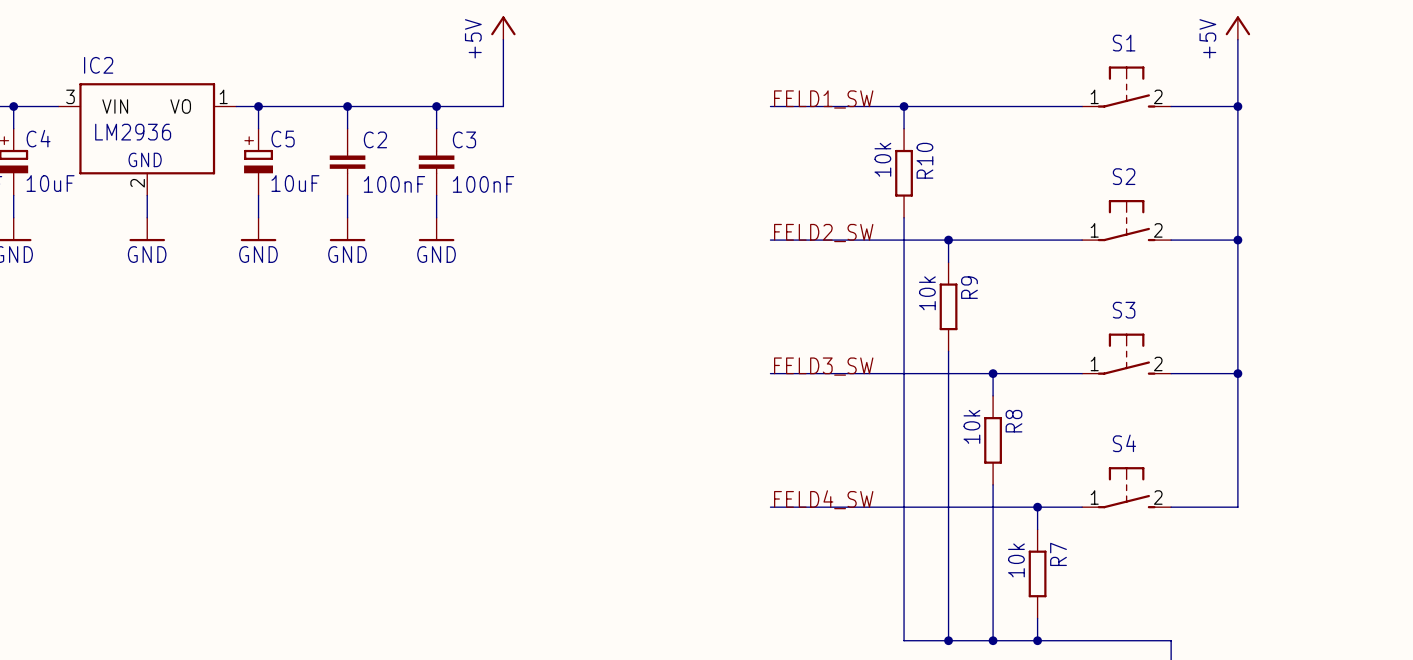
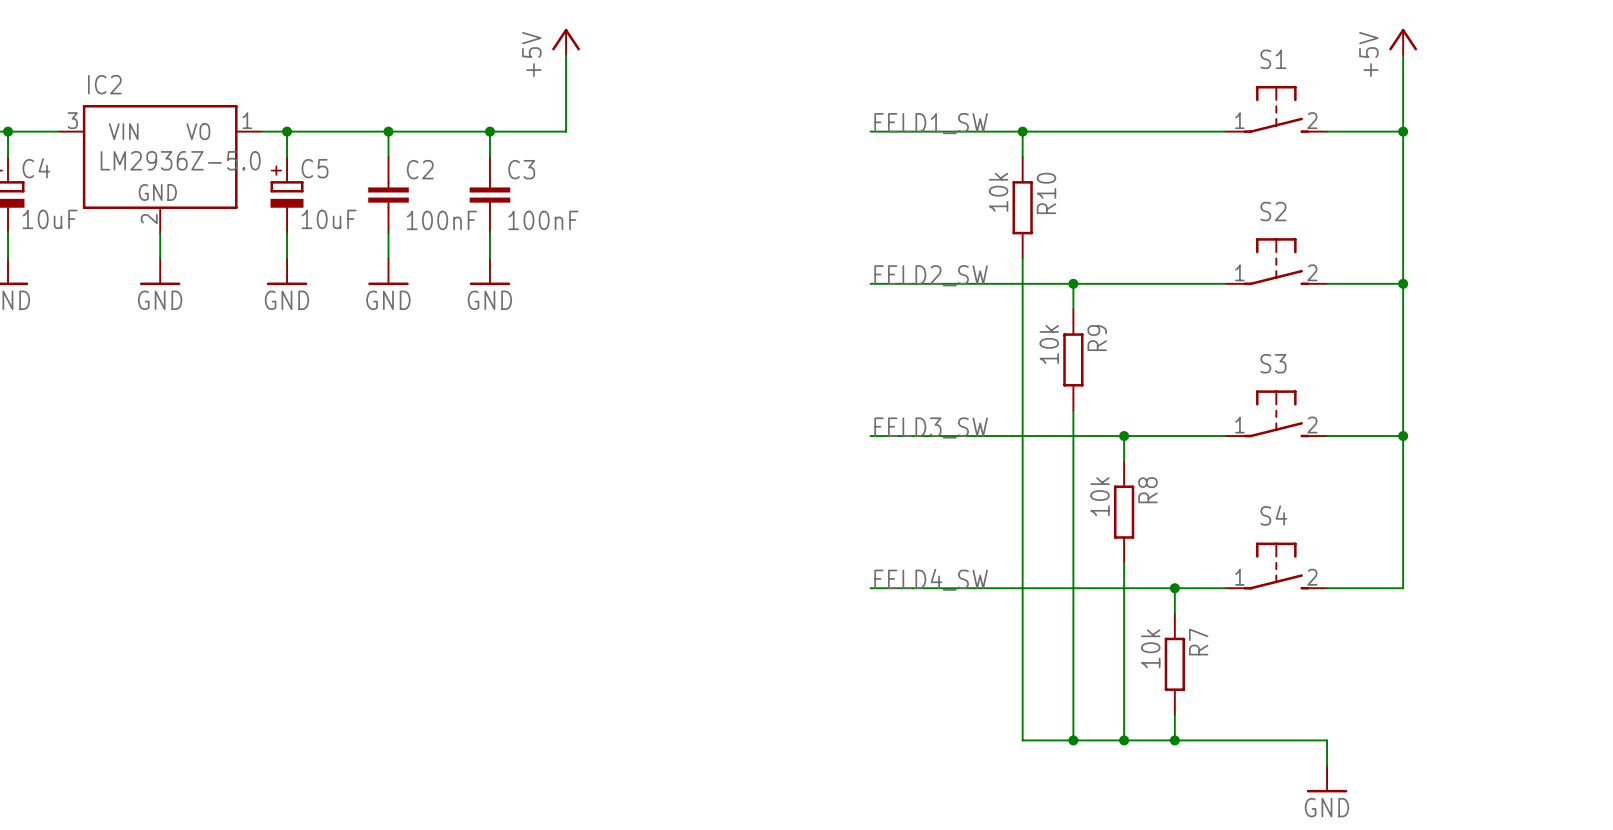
IC2 value: LM2936 (133, 132) -> LM2936Z-5.0 (180, 160)

